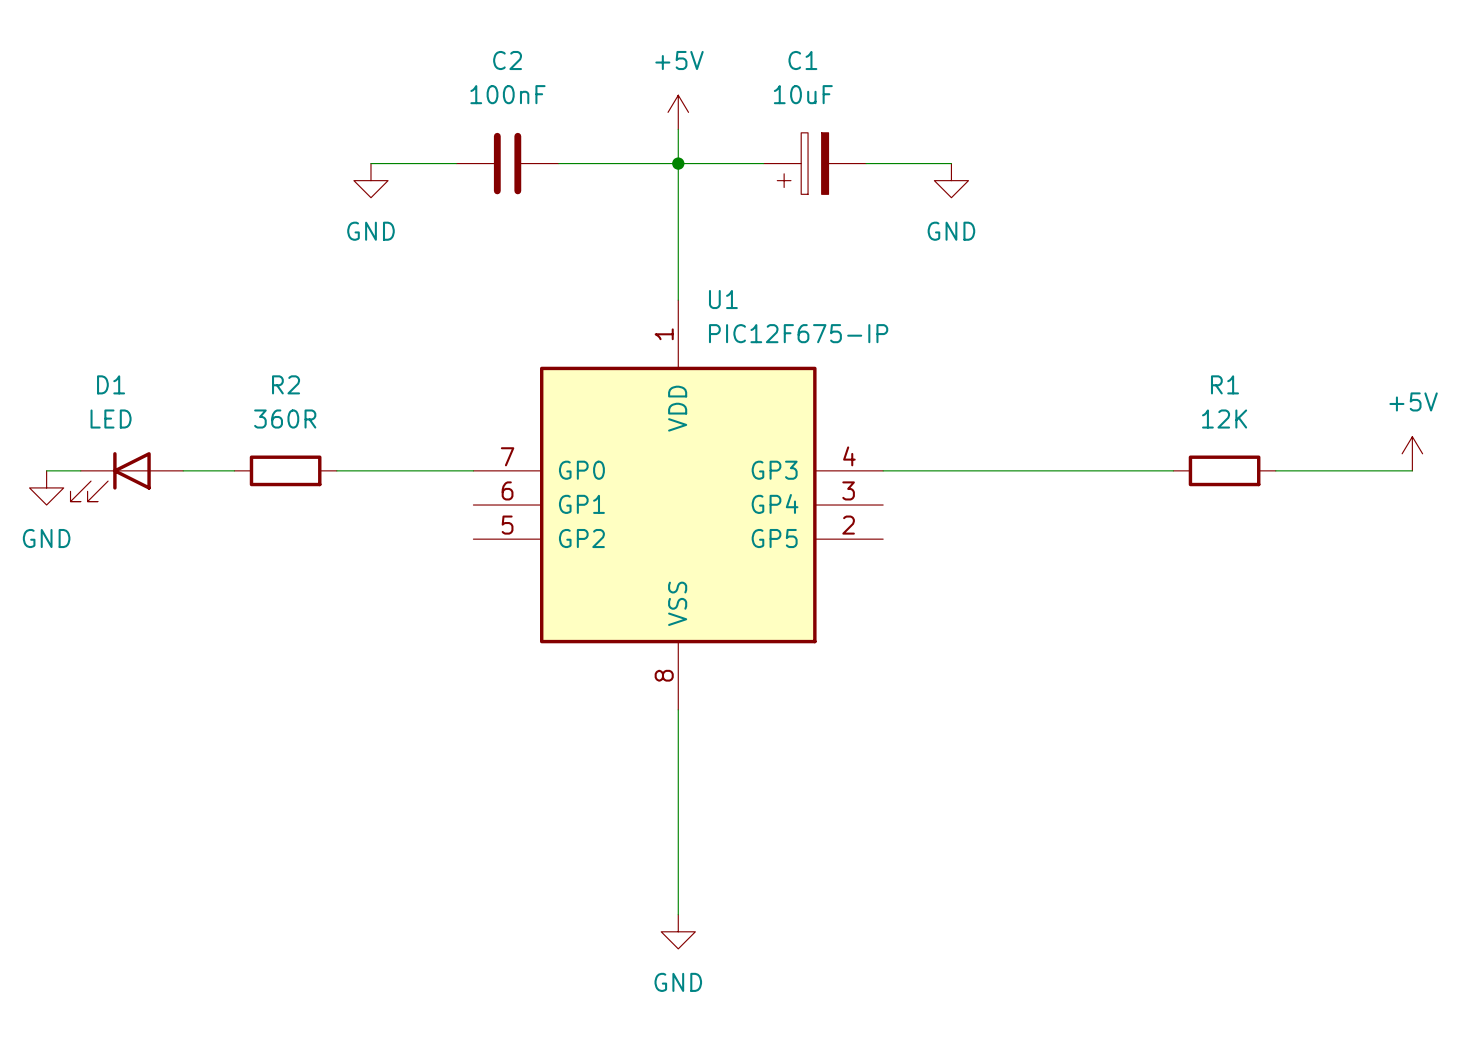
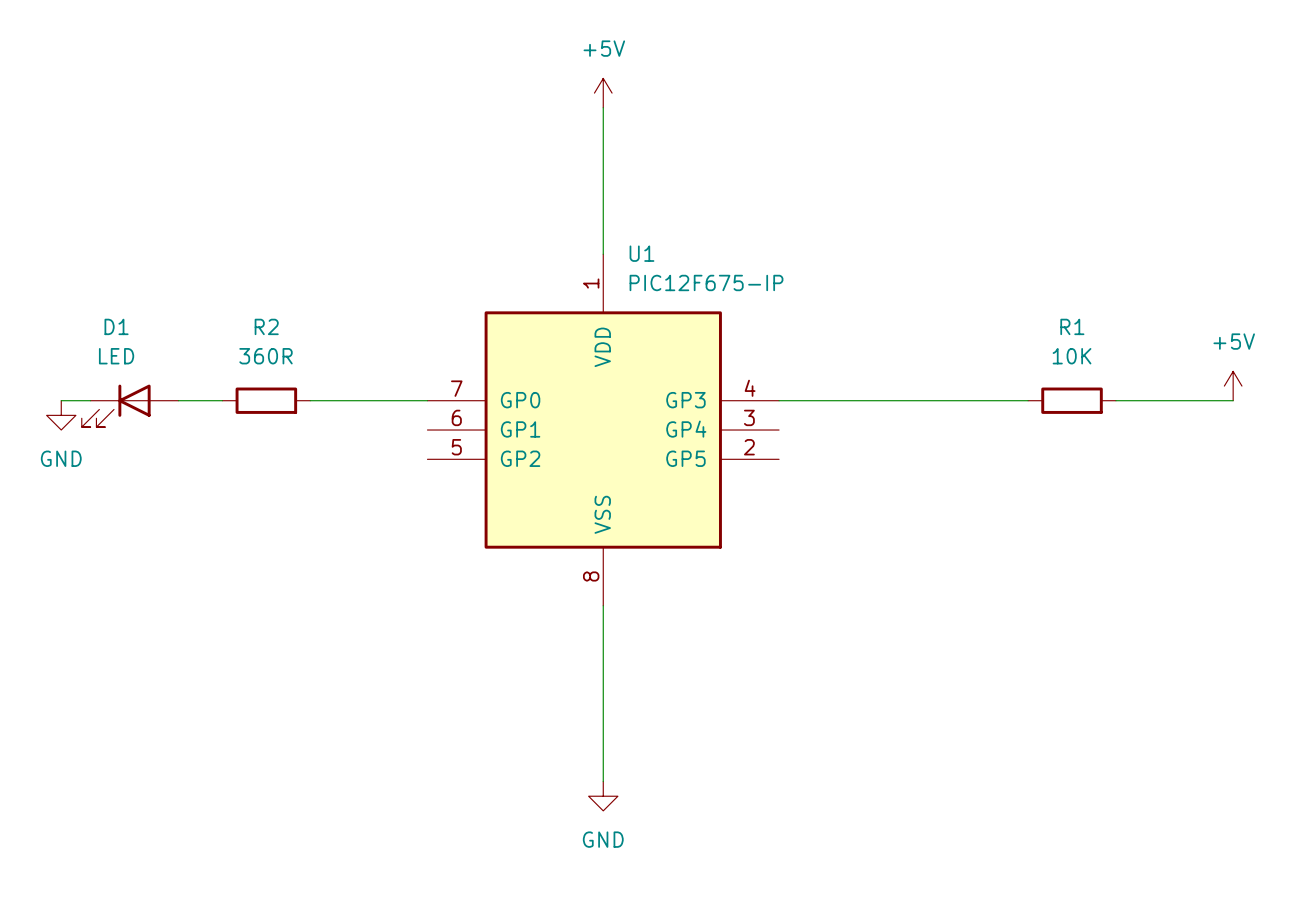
wire: (370, 163) (456, 163) -> none
C2: 100nF (507, 163) -> none
wire: (558, 163) (763, 163) -> none
junction: (678, 163) -> none
C1: 10uF (814, 163) -> none
wire: (866, 163) (951, 163) -> none
power symbol: GND (370, 180) -> none
power symbol: GND (951, 180) -> none
R1 value: 12K (1224, 419) -> 10K (1072, 356)

